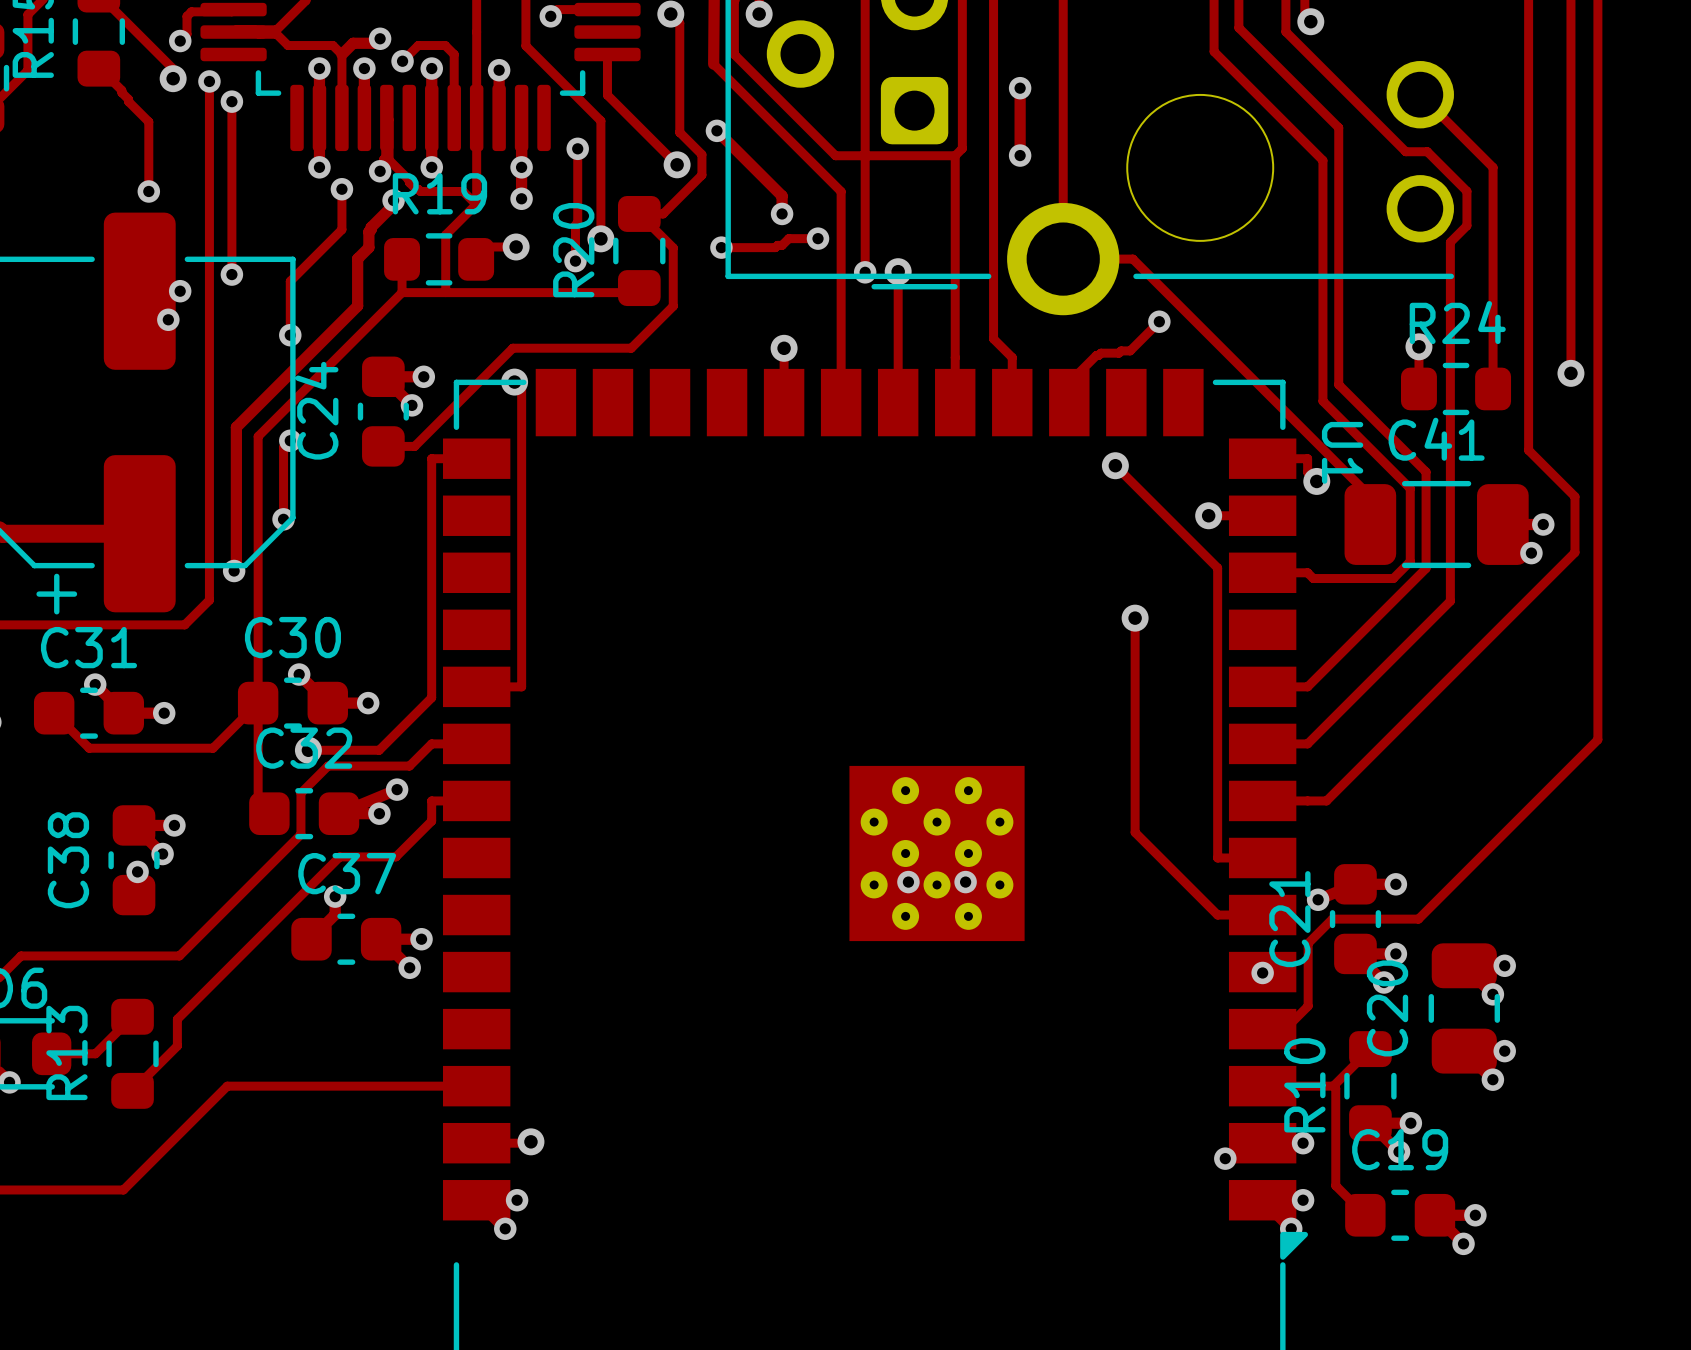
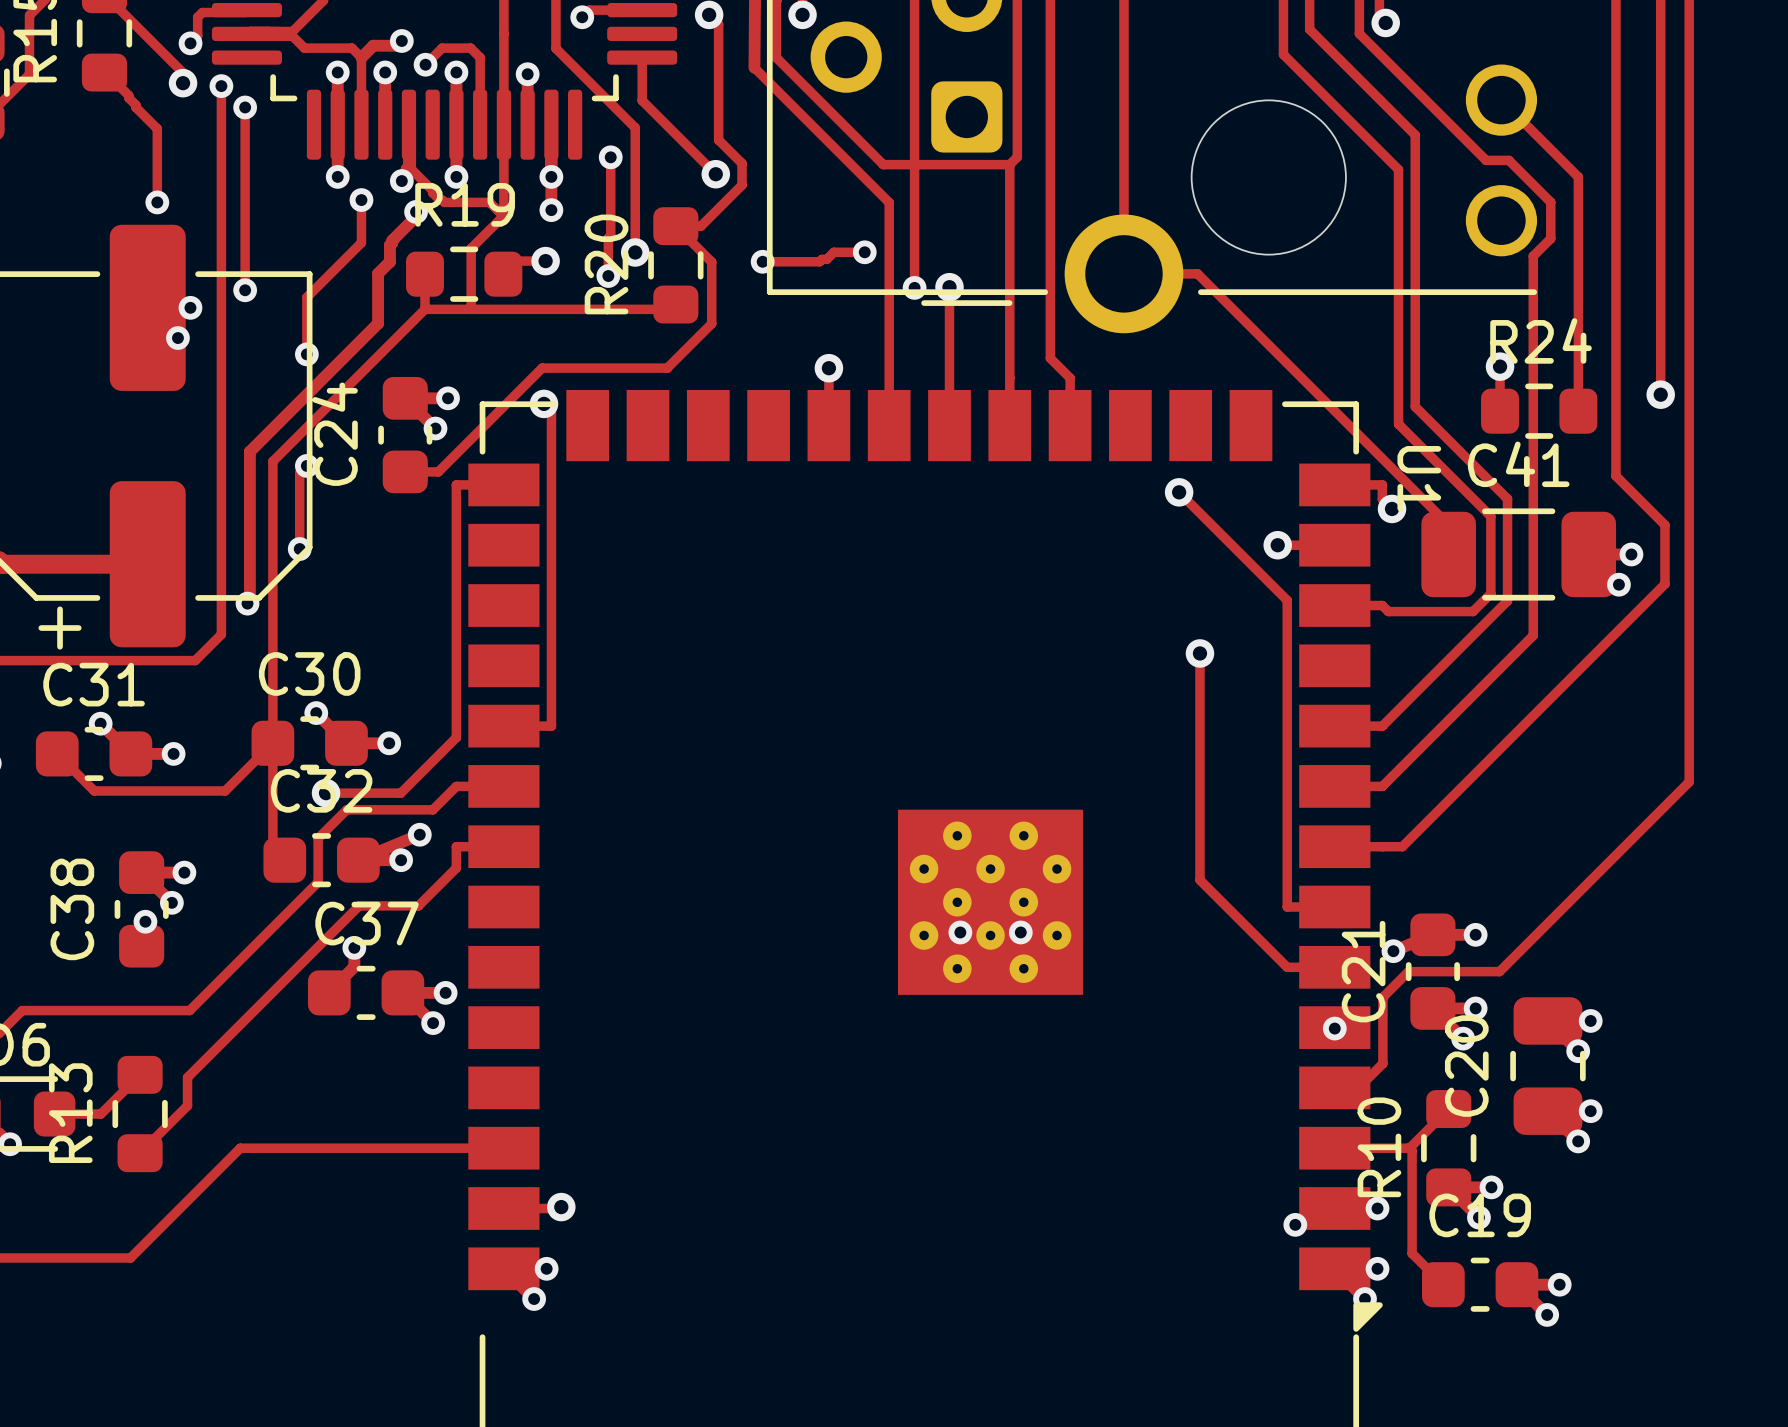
track: (1020, 88) (1020, 155) -> none
via: (1020, 88) -> none
track: (716, 130) (782, 195) (782, 213) -> none
via: (716, 130) -> none
via: (1020, 155) -> none
via: (782, 213) -> none
track: (1159, 321) (1130, 350) (1100, 353) (1096, 355) (1071, 380) (1071, 400) (1069, 402) -> none
via: (1159, 321) -> none

